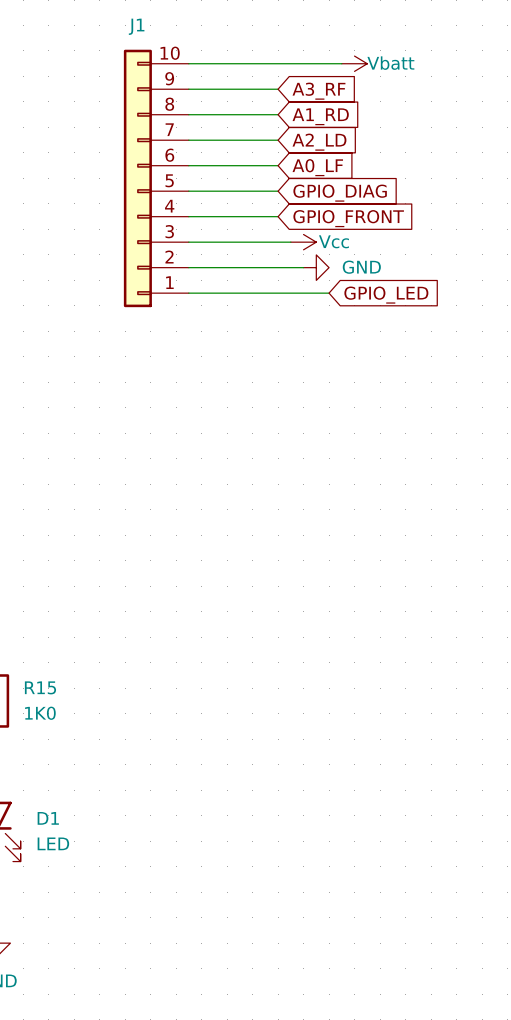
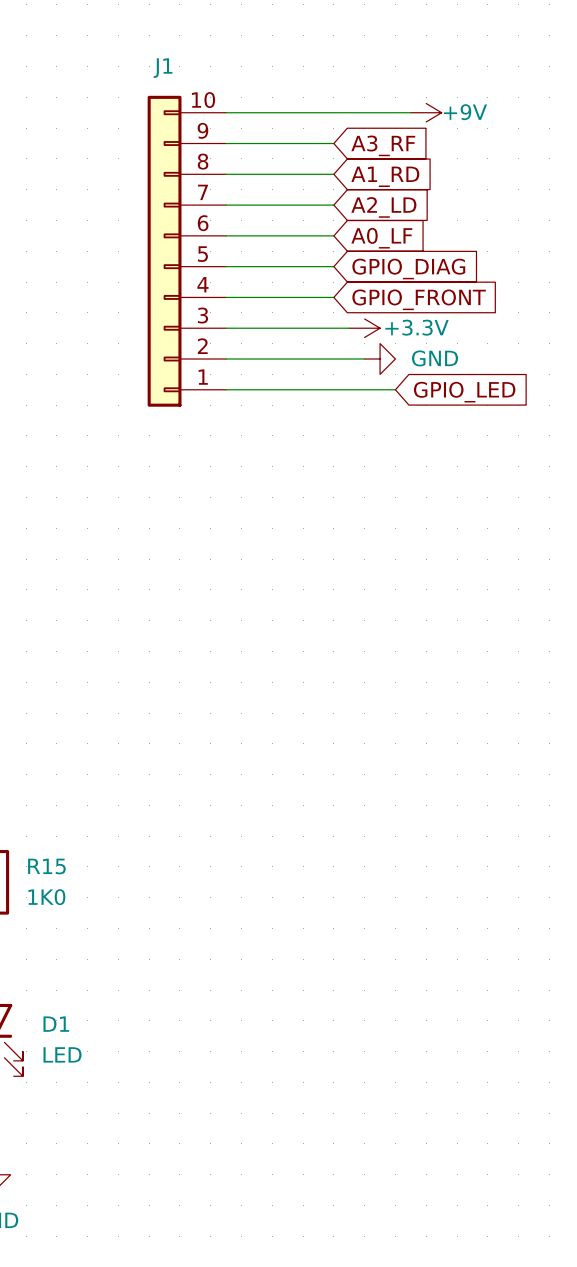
power symbol: Vbatt (354, 63) -> +9V (426, 112)
power symbol: Vcc (303, 242) -> +3.3V (364, 328)

